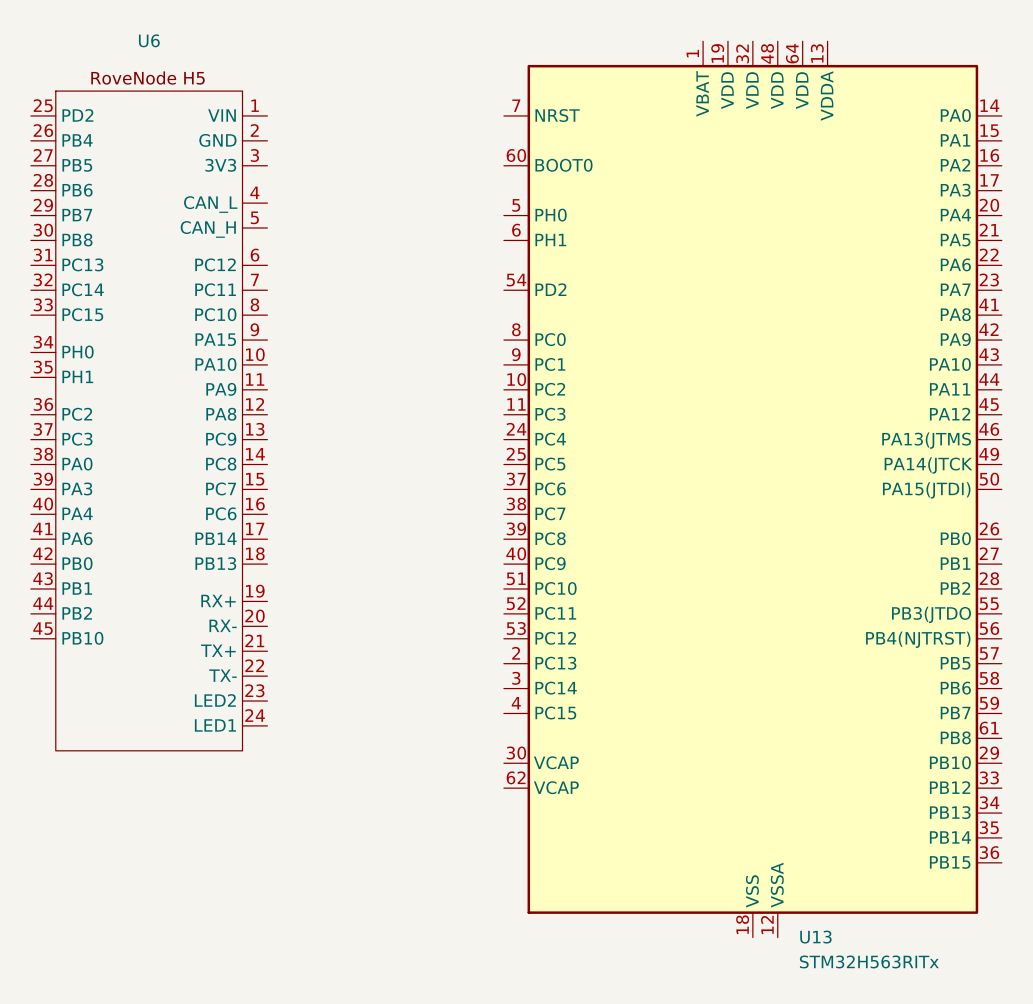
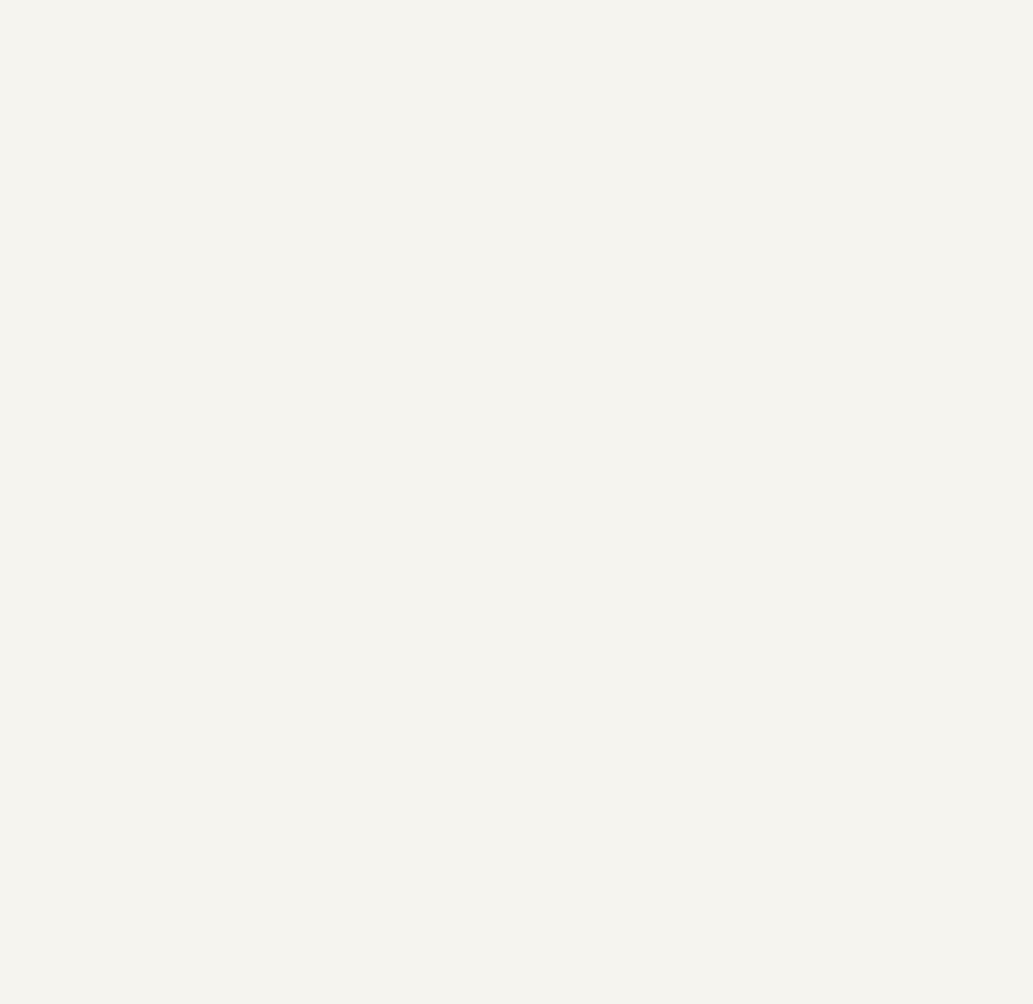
U6: (149, 420) -> none
U13: STM32H563RITx (752, 489) -> none

